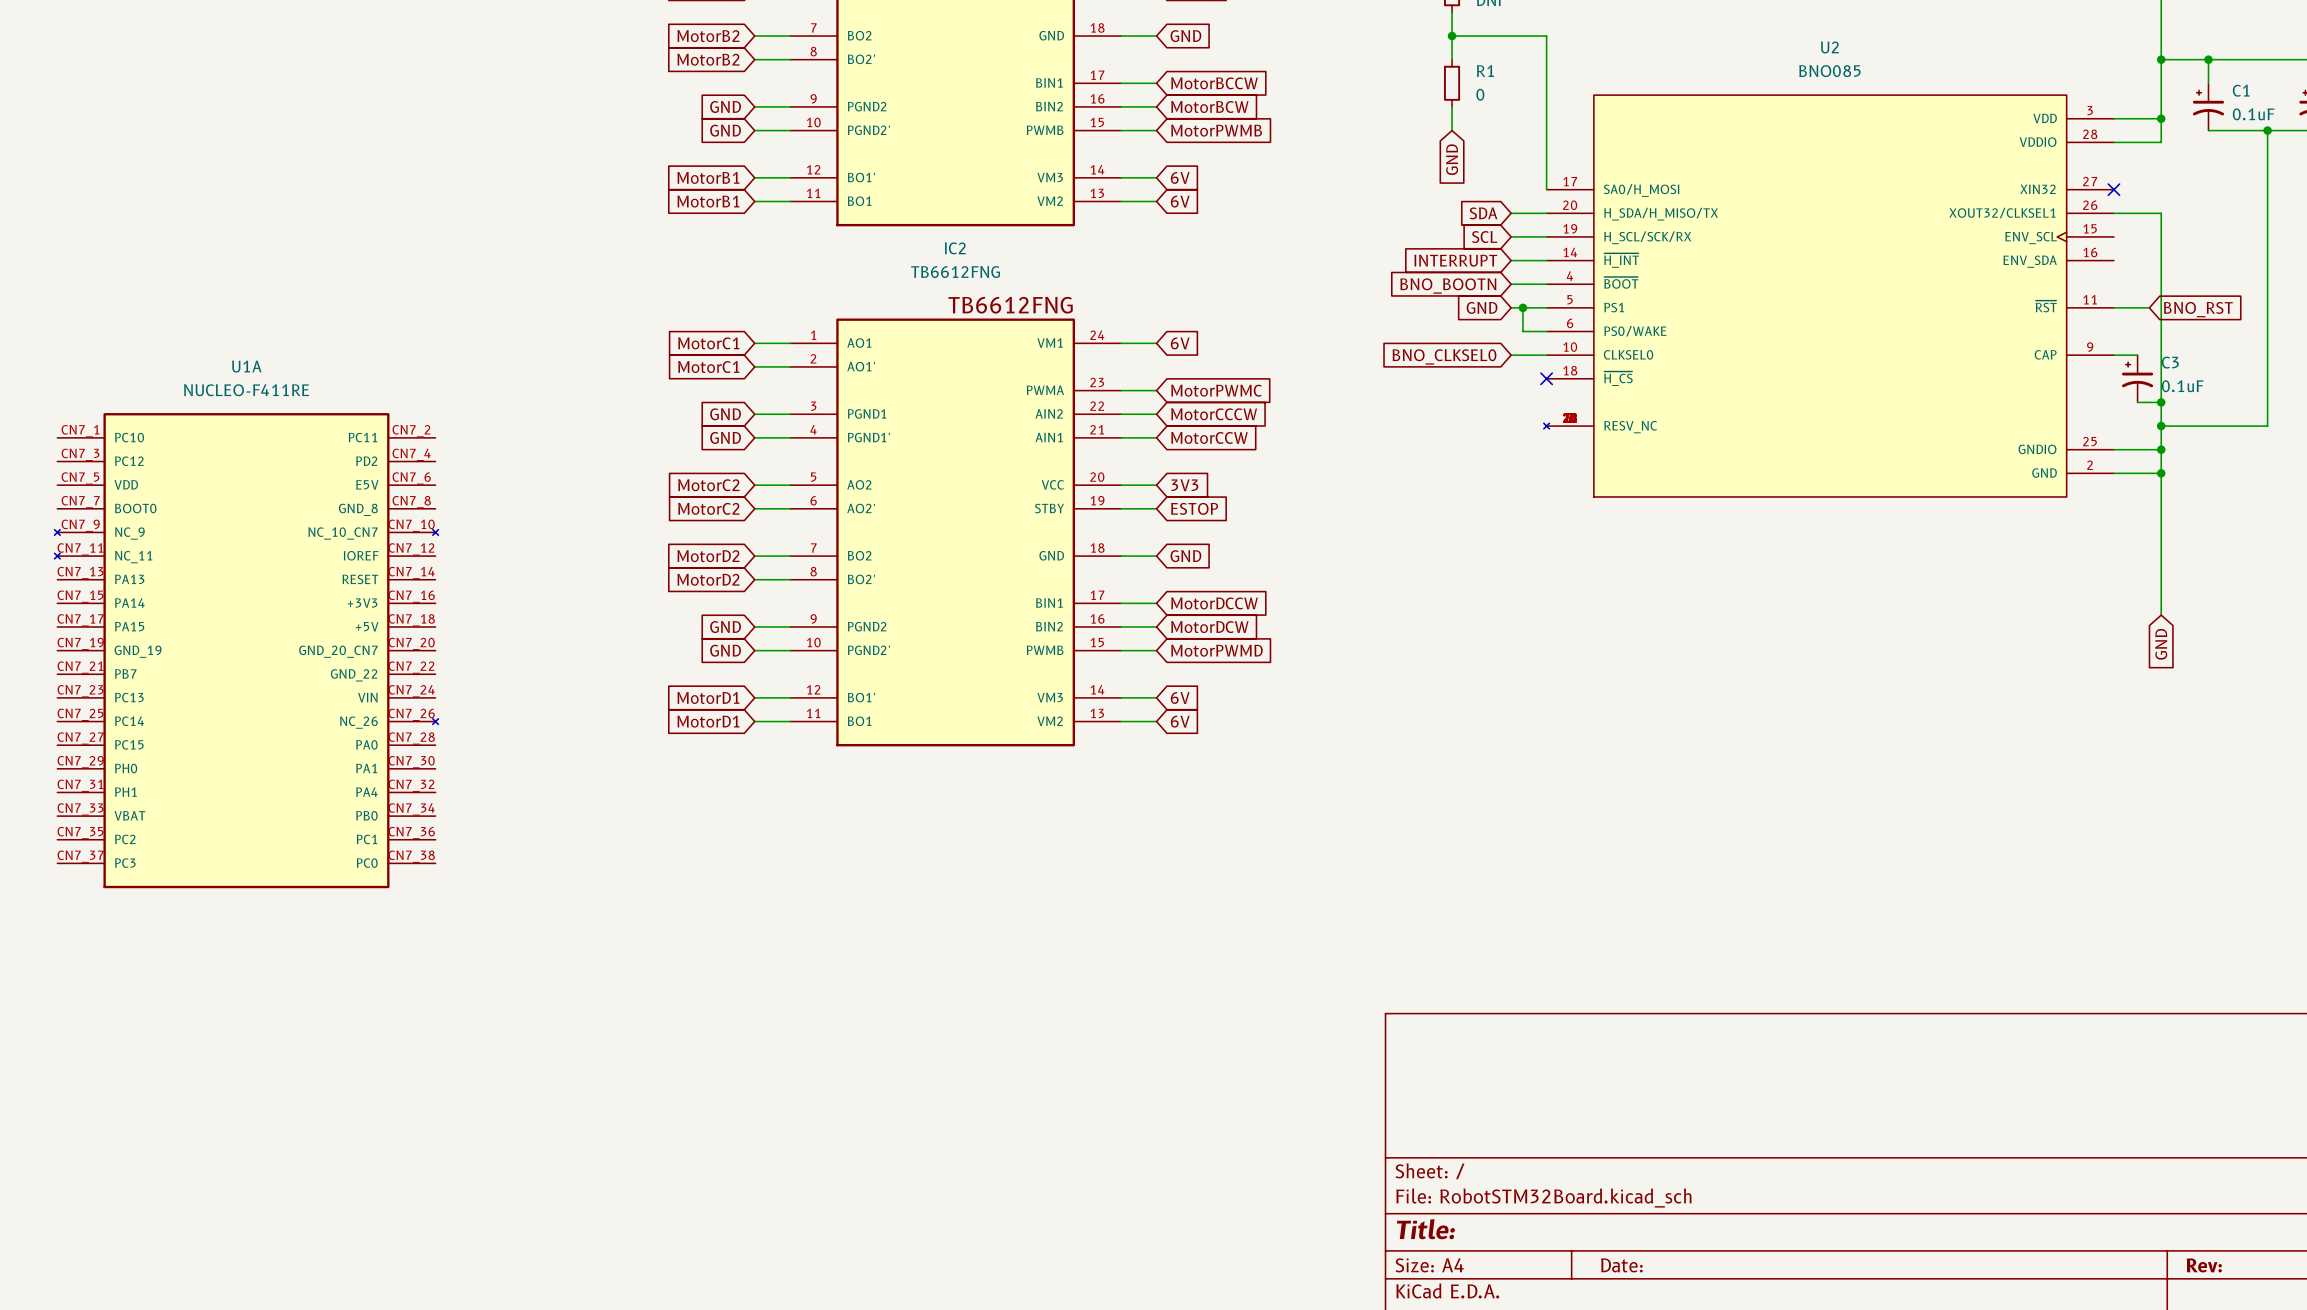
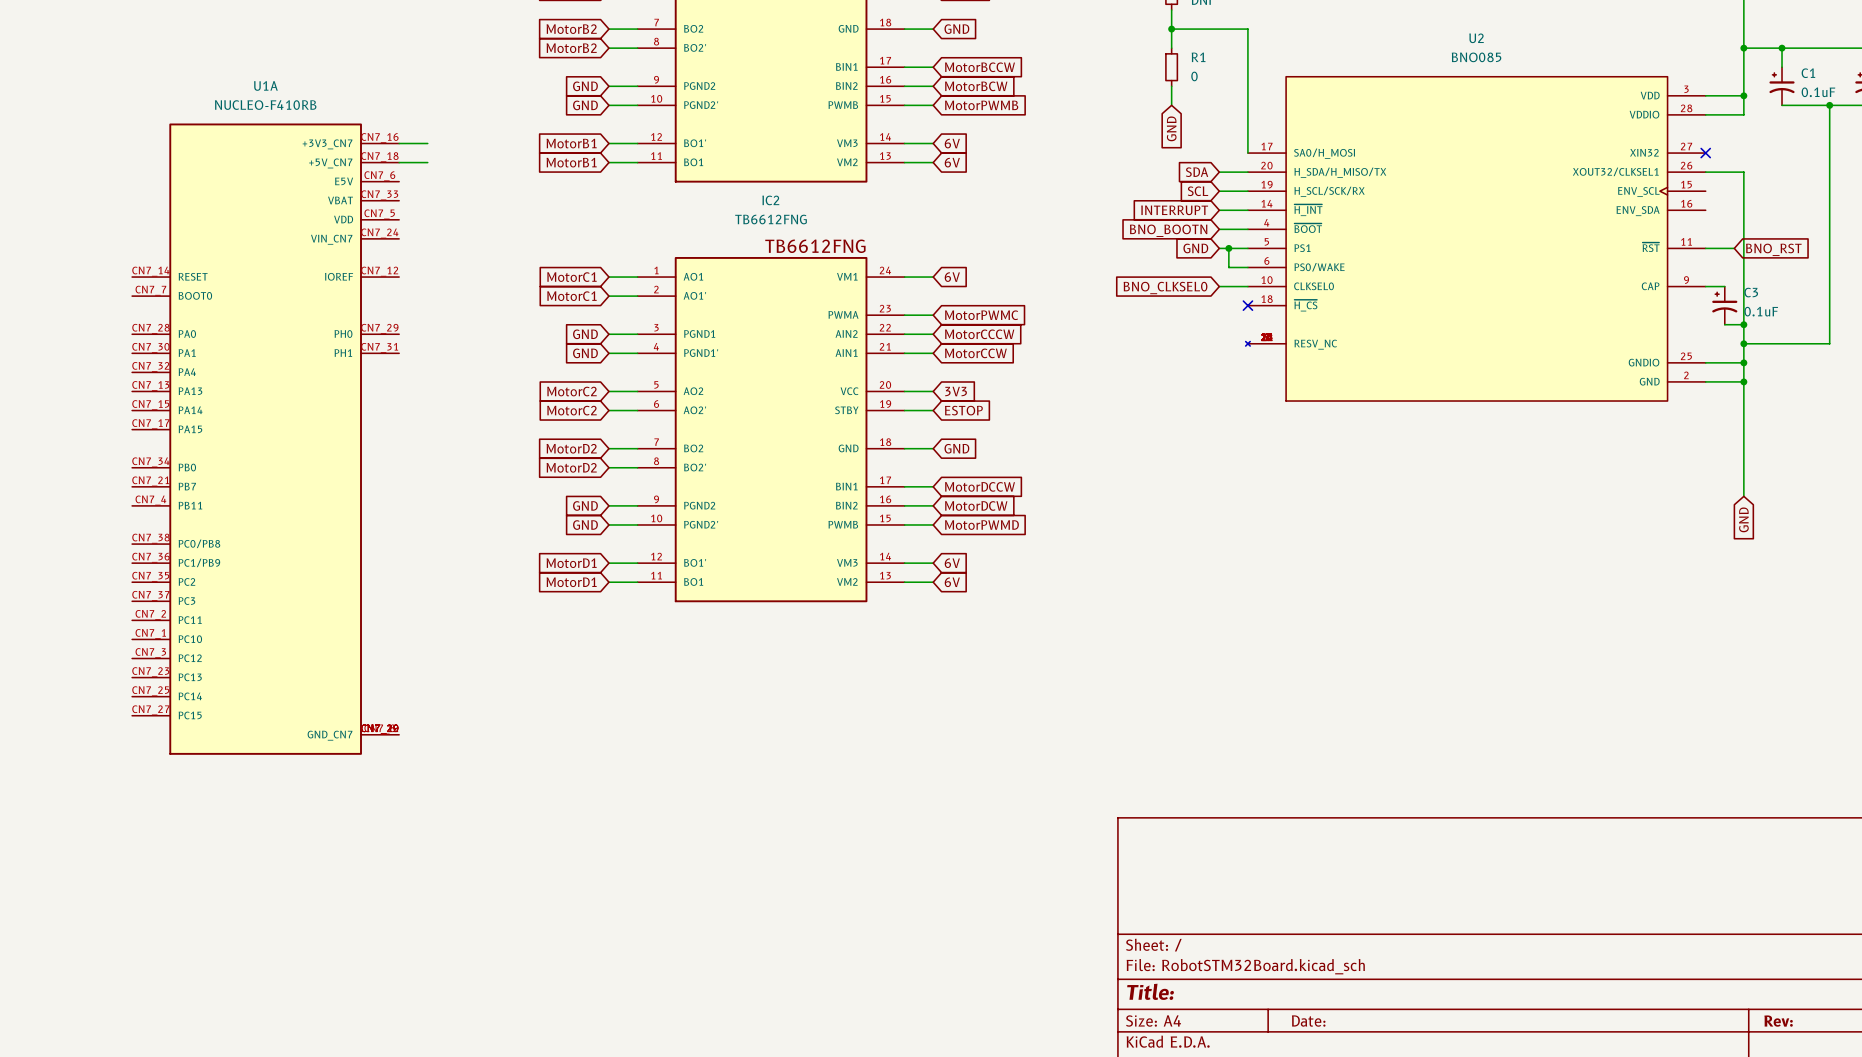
wire: none -> (399, 143) (427, 143)
wire: none -> (399, 162) (427, 162)
U1A name position: U1A (246, 366) -> U1A (265, 85)
U1A value: NUCLEO-F411RE (246, 390) -> NUCLEO-F410RB (265, 105)
U1A symbol: [54, 413, 439, 889] -> [132, 123, 400, 755]

